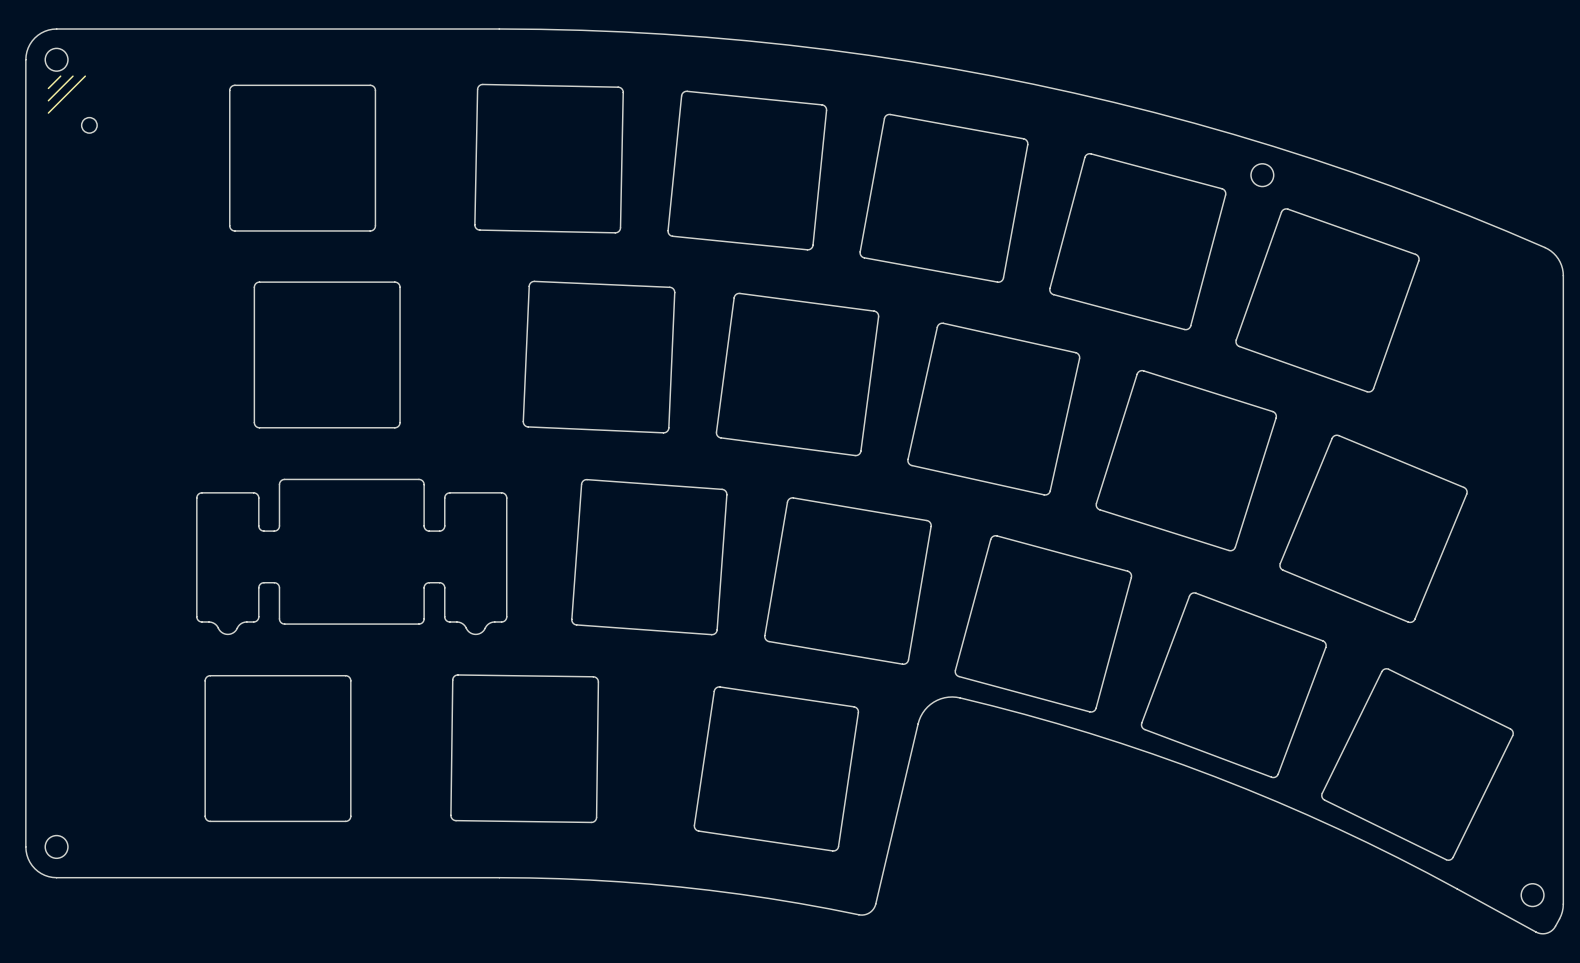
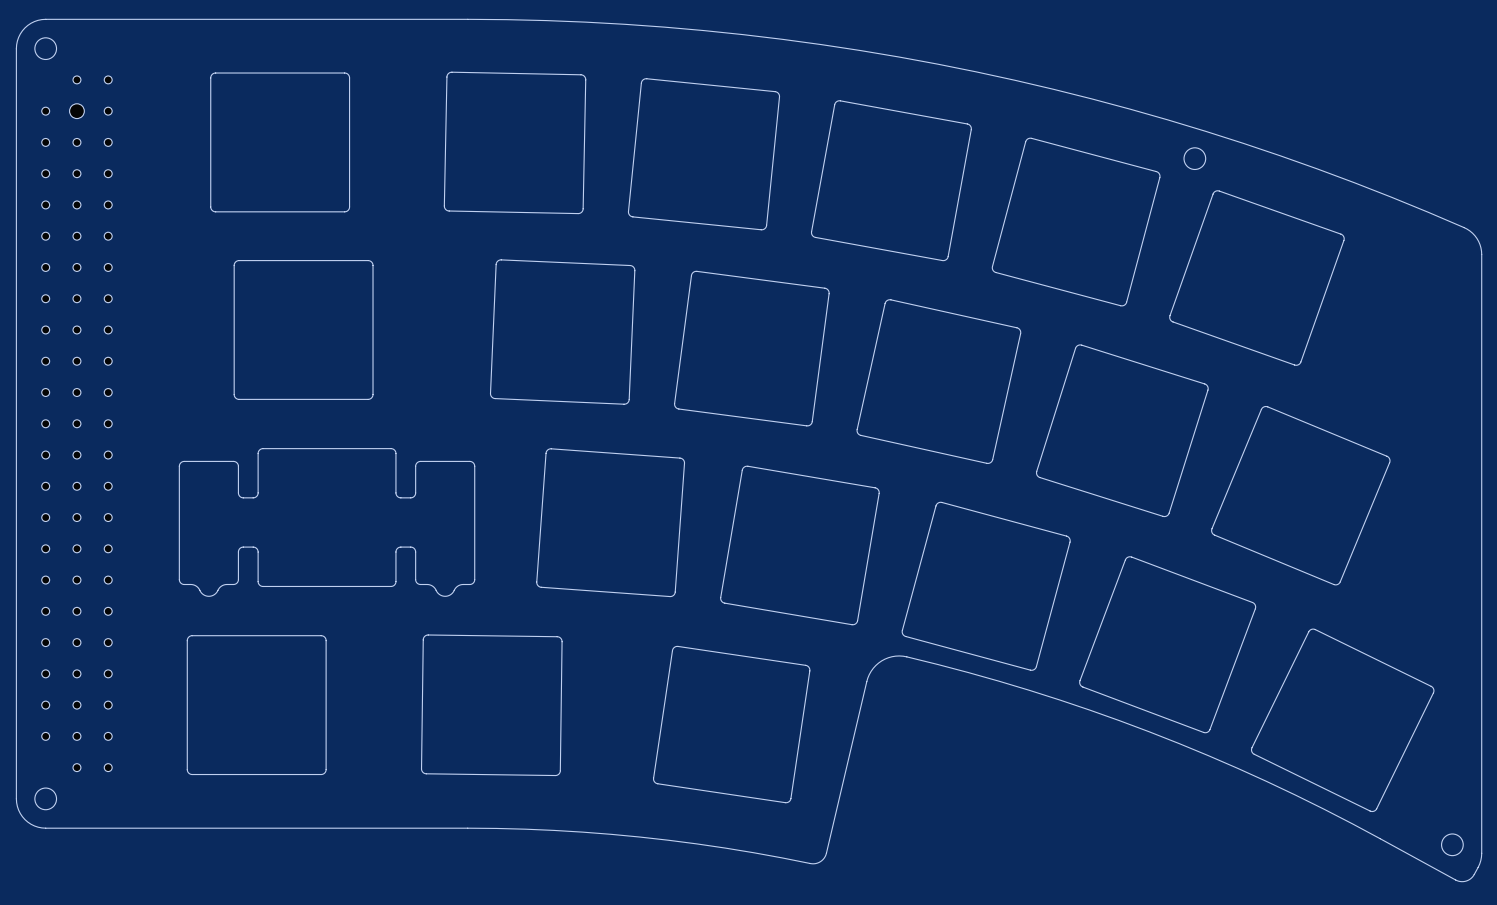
line: (60, 76) (48, 88) -> none
line: (72, 76) (48, 100) -> none
line: (85, 76) (48, 113) -> none
part: none -> (76, 79)
part: none -> (108, 79)
part: none -> (45, 111)
part: none -> (108, 111)
part: none -> (45, 142)
part: none -> (76, 142)
part: none -> (108, 142)
part: none -> (45, 173)
part: none -> (76, 173)
part: none -> (108, 173)
part: none -> (45, 204)
part: none -> (76, 204)
part: none -> (108, 204)
part: none -> (45, 236)
part: none -> (76, 236)
part: none -> (108, 236)
part: none -> (45, 267)
part: none -> (76, 267)
part: none -> (108, 267)
part: none -> (45, 298)
part: none -> (76, 298)
part: none -> (108, 298)
part: none -> (45, 329)
part: none -> (76, 329)
part: none -> (108, 329)
part: none -> (45, 361)
part: none -> (76, 361)
part: none -> (108, 361)
part: none -> (45, 392)
part: none -> (76, 392)
part: none -> (108, 392)
part: none -> (45, 423)
part: none -> (76, 423)
part: none -> (108, 423)
part: none -> (45, 455)
part: none -> (76, 455)
part: none -> (108, 455)
part: none -> (45, 486)
part: none -> (76, 486)
part: none -> (108, 486)
part: none -> (45, 517)
part: none -> (76, 517)
part: none -> (108, 517)
part: none -> (45, 548)
part: none -> (76, 548)
part: none -> (108, 548)
part: none -> (45, 580)
part: none -> (76, 580)
part: none -> (108, 580)
part: none -> (45, 611)
part: none -> (76, 611)
part: none -> (108, 611)
part: none -> (45, 642)
part: none -> (76, 642)
part: none -> (108, 642)
part: none -> (45, 673)
part: none -> (76, 673)
part: none -> (108, 673)
part: none -> (45, 705)
part: none -> (76, 705)
part: none -> (108, 705)
part: none -> (45, 736)
part: none -> (76, 736)
part: none -> (108, 736)
part: none -> (76, 767)
part: none -> (108, 767)

